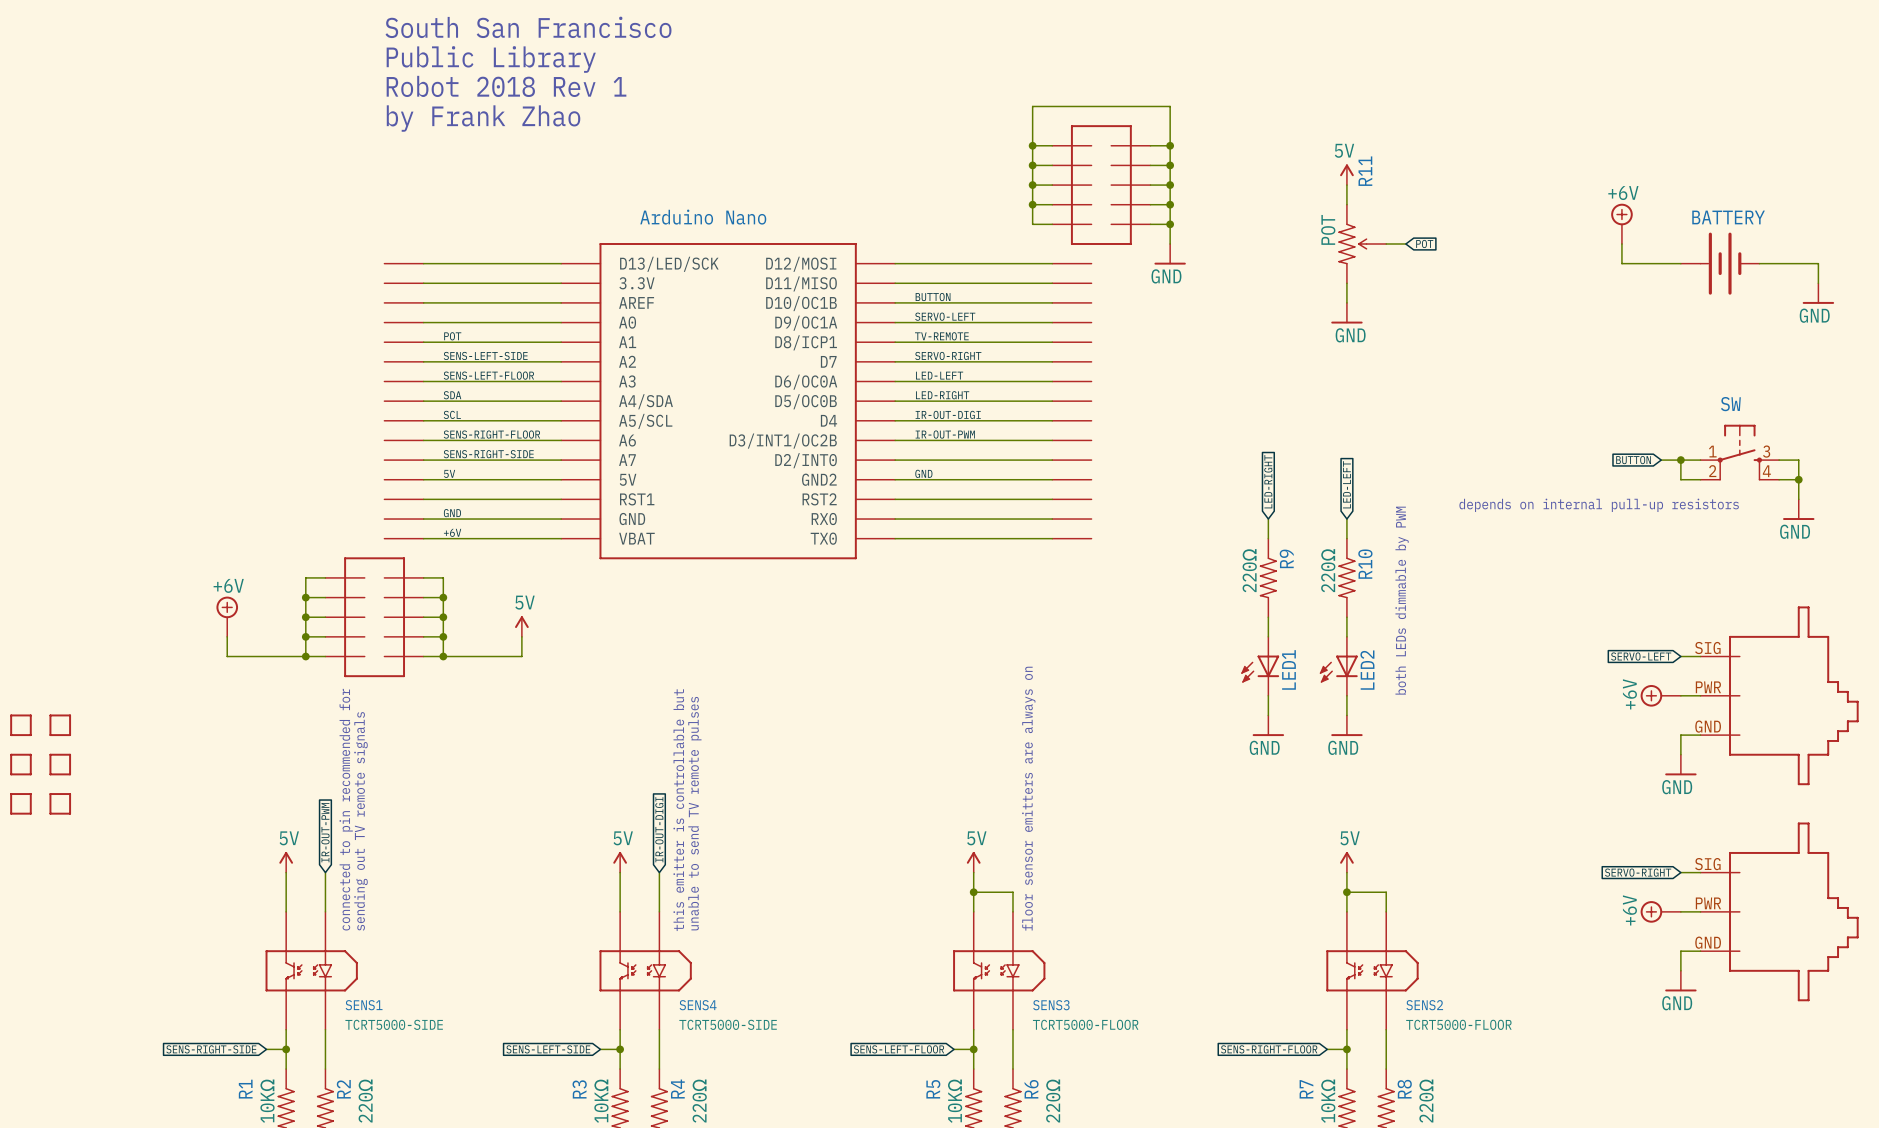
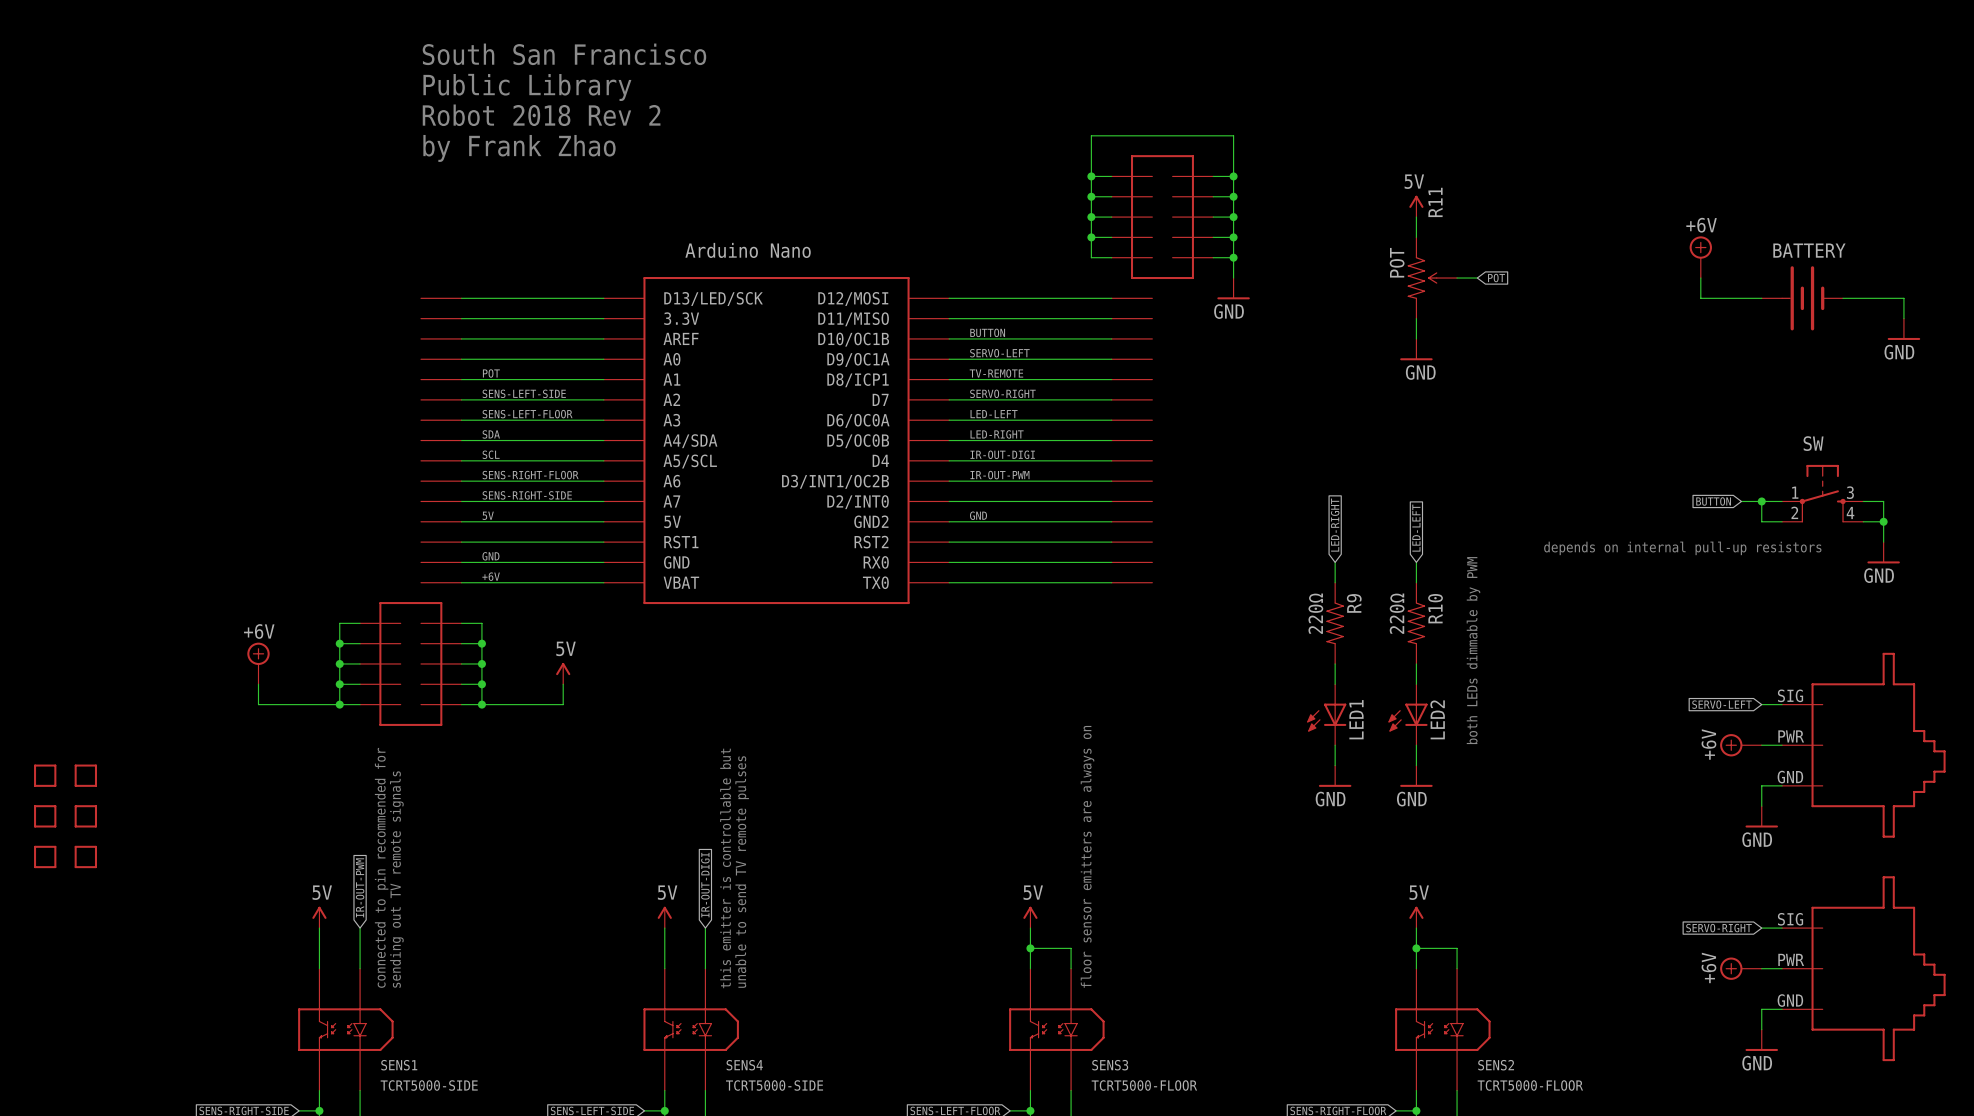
part text: Robot 2018 Rev 1 (506, 86) -> Robot 2018 Rev 2 (541, 115)

